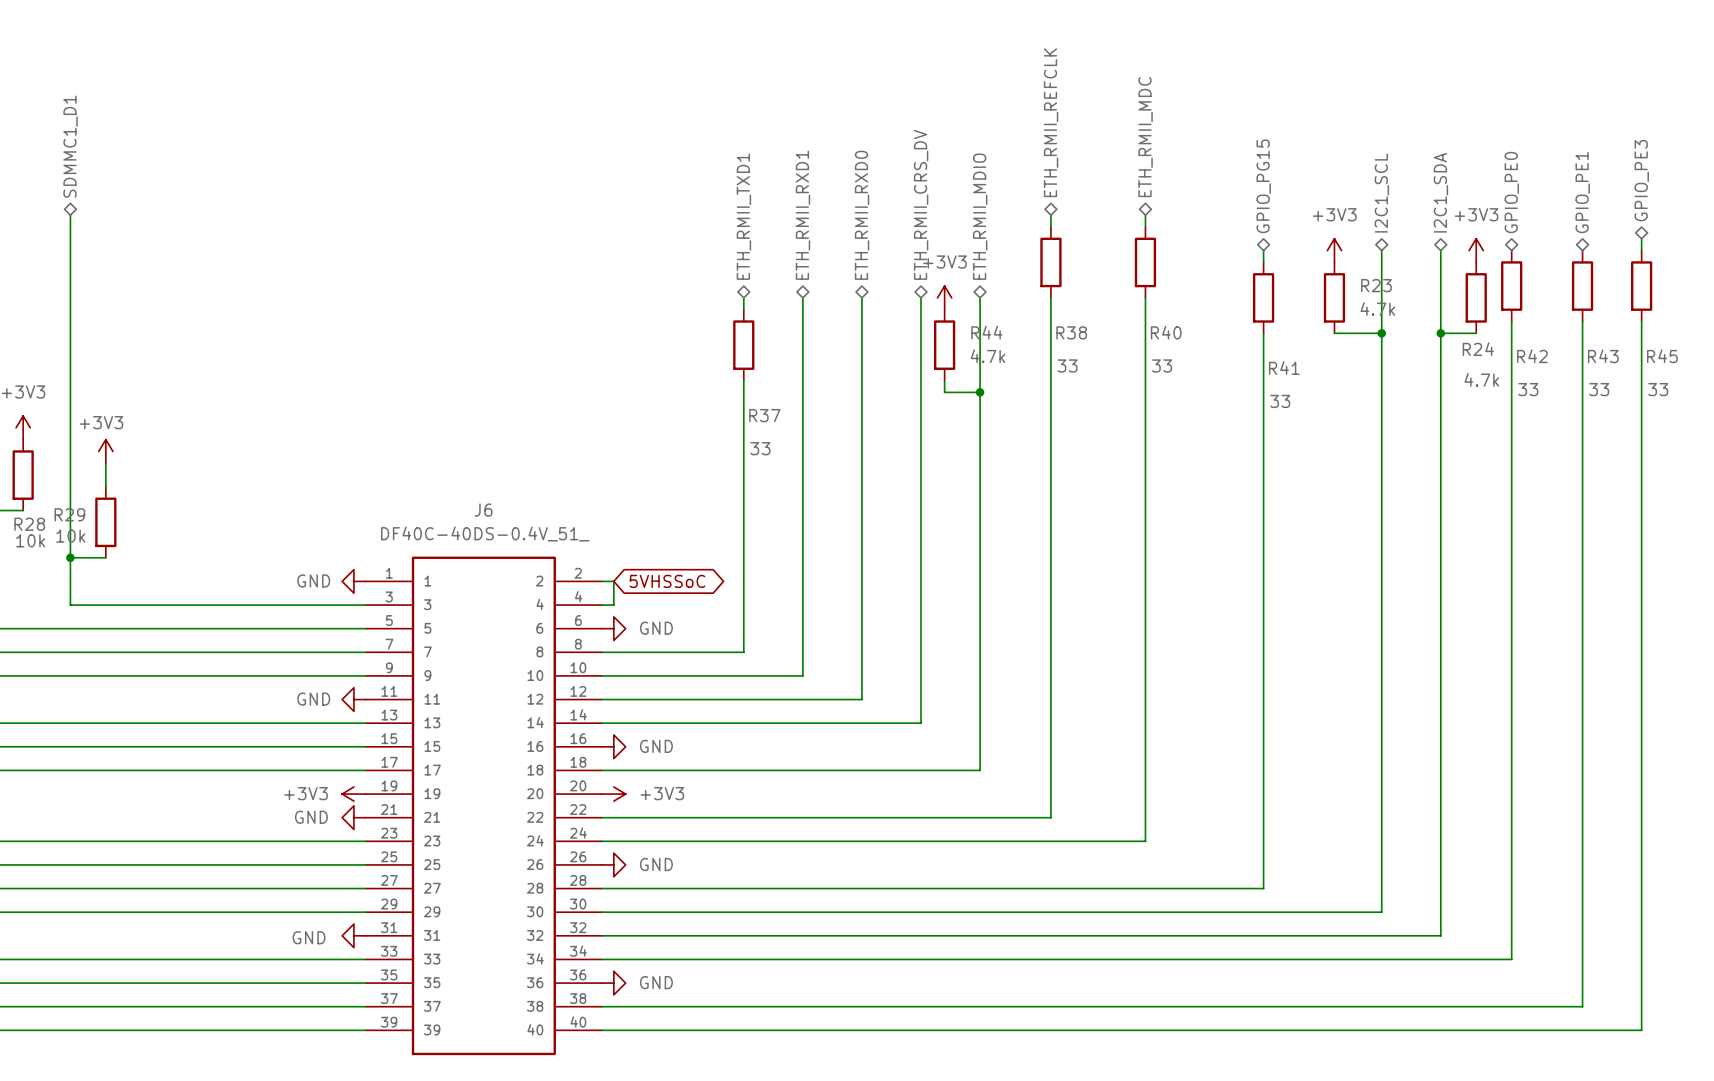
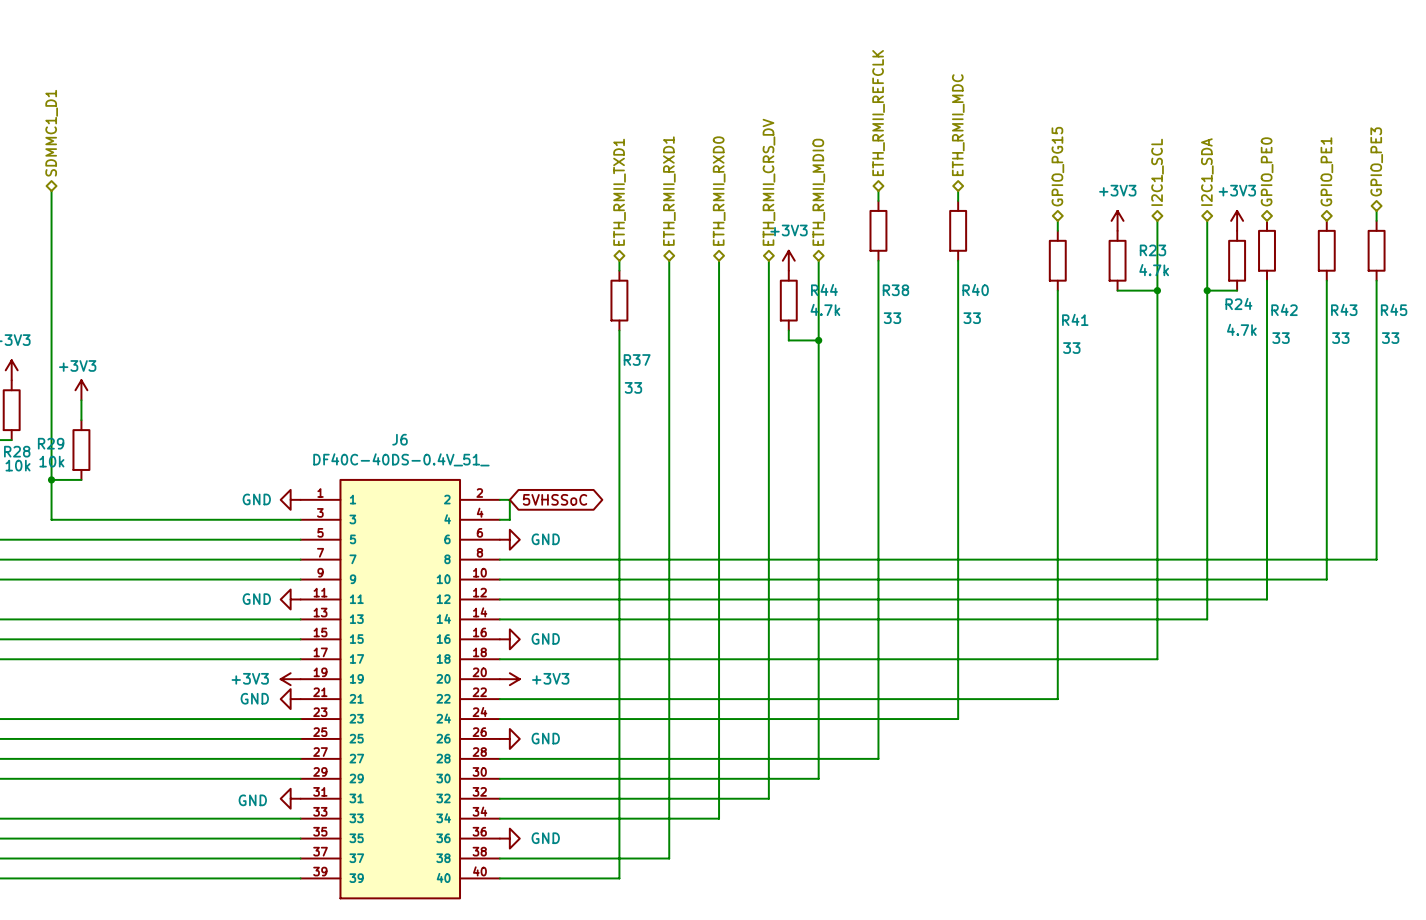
wire: (1641, 652) (1641, 1030) (743, 1030) -> (1376, 559) (619, 559) (619, 878)
wire: (1582, 675) (1582, 1006) (802, 1006) -> (1326, 579) (669, 579) (669, 858)
wire: (1511, 699) (1511, 959) (861, 959) -> (1267, 599) (719, 599) (719, 818)
wire: (1440, 723) (1440, 935) (920, 935) -> (1207, 619) (768, 619) (768, 798)
wire: (1381, 770) (1381, 912) (980, 912) -> (1157, 659) (818, 659) (818, 778)
wire: (1263, 817) (1263, 888) (1050, 888) -> (1057, 699) (878, 699) (878, 758)

